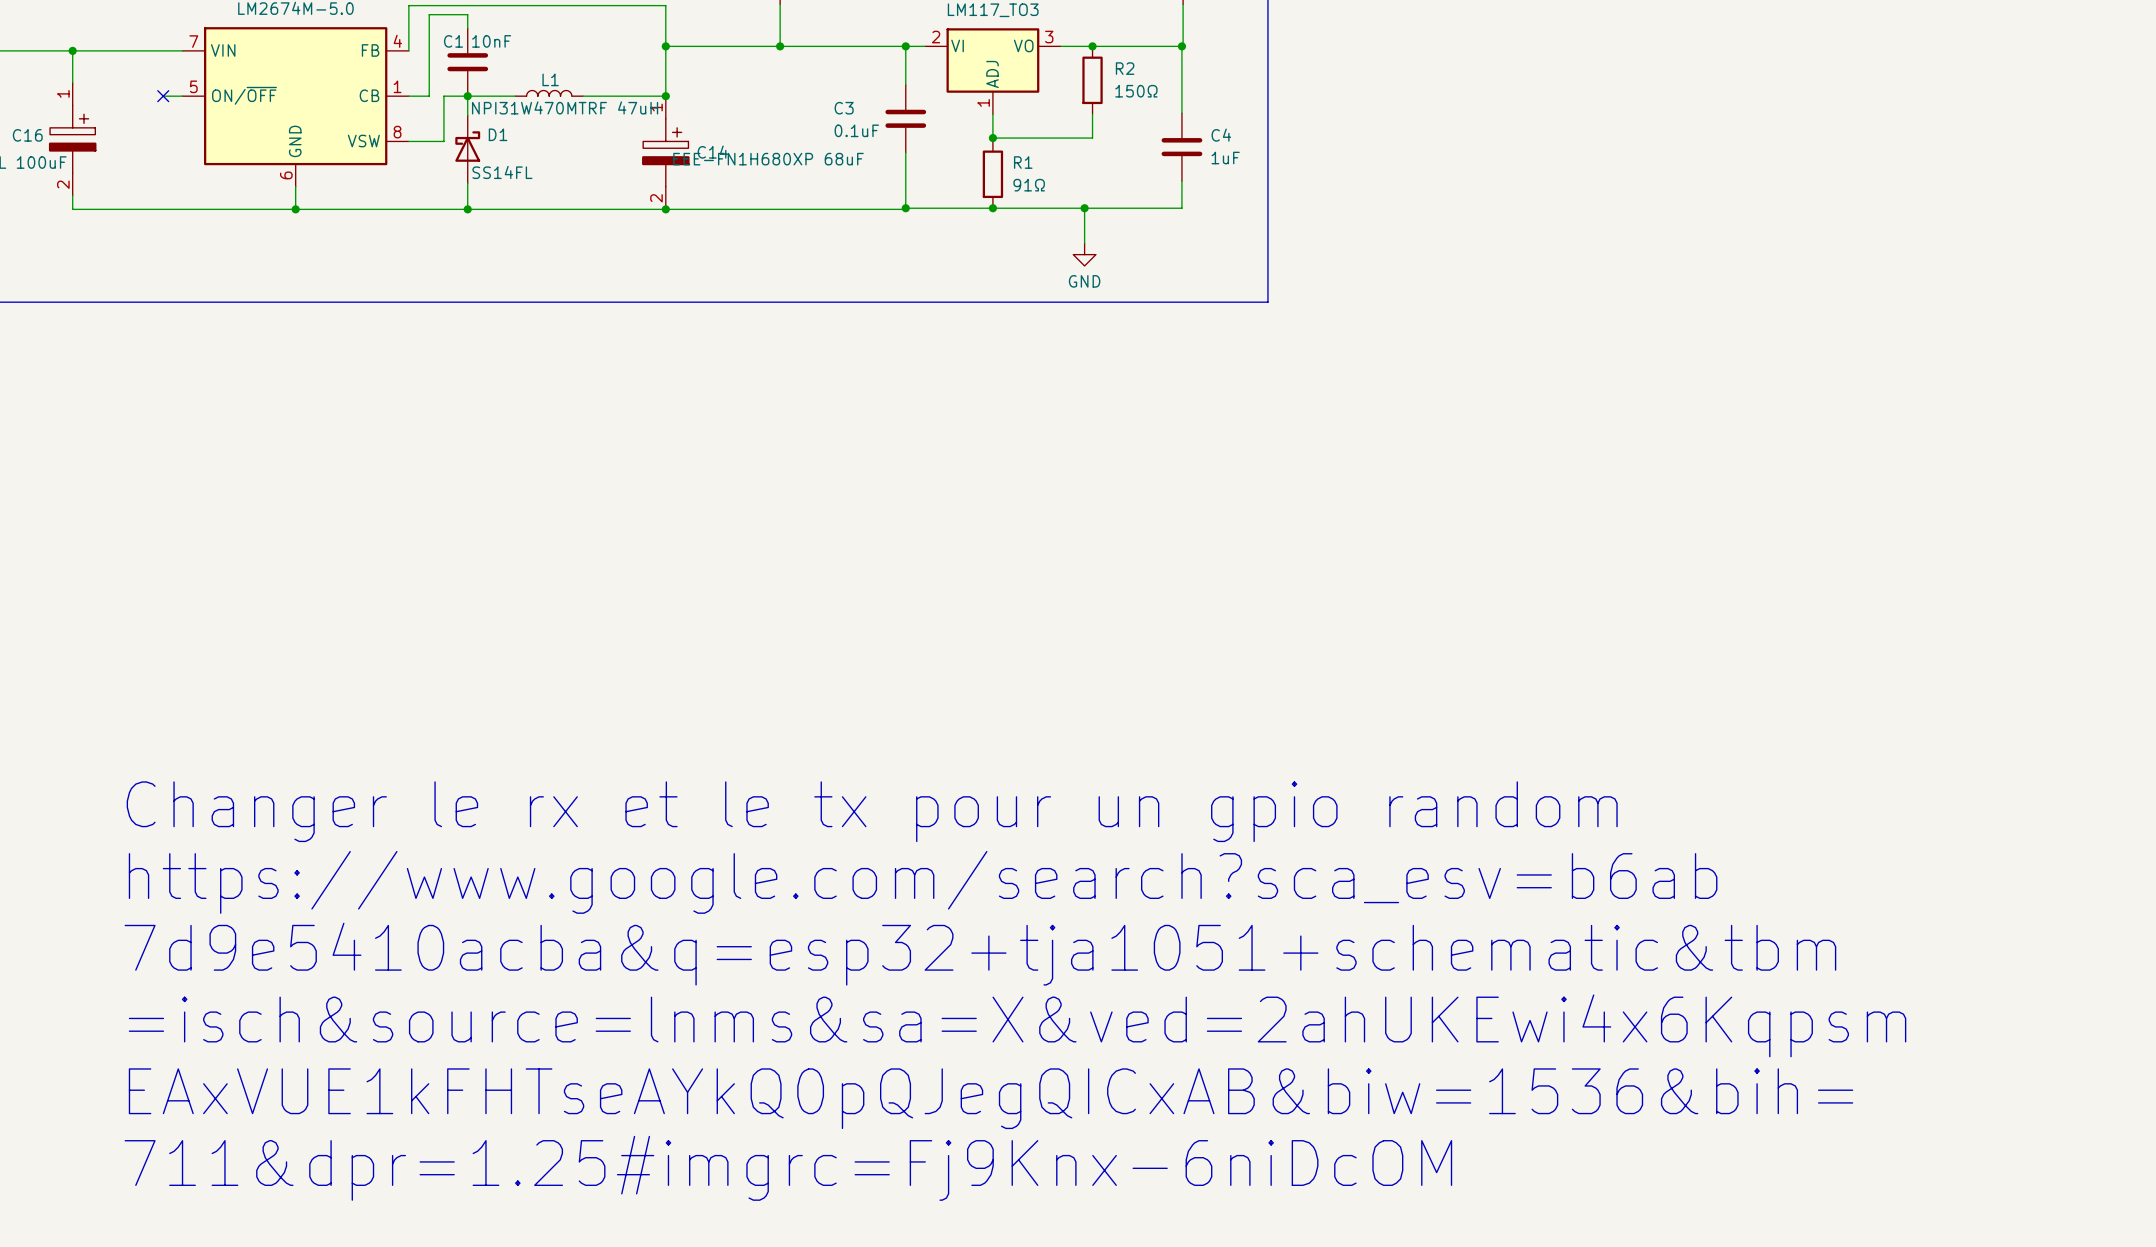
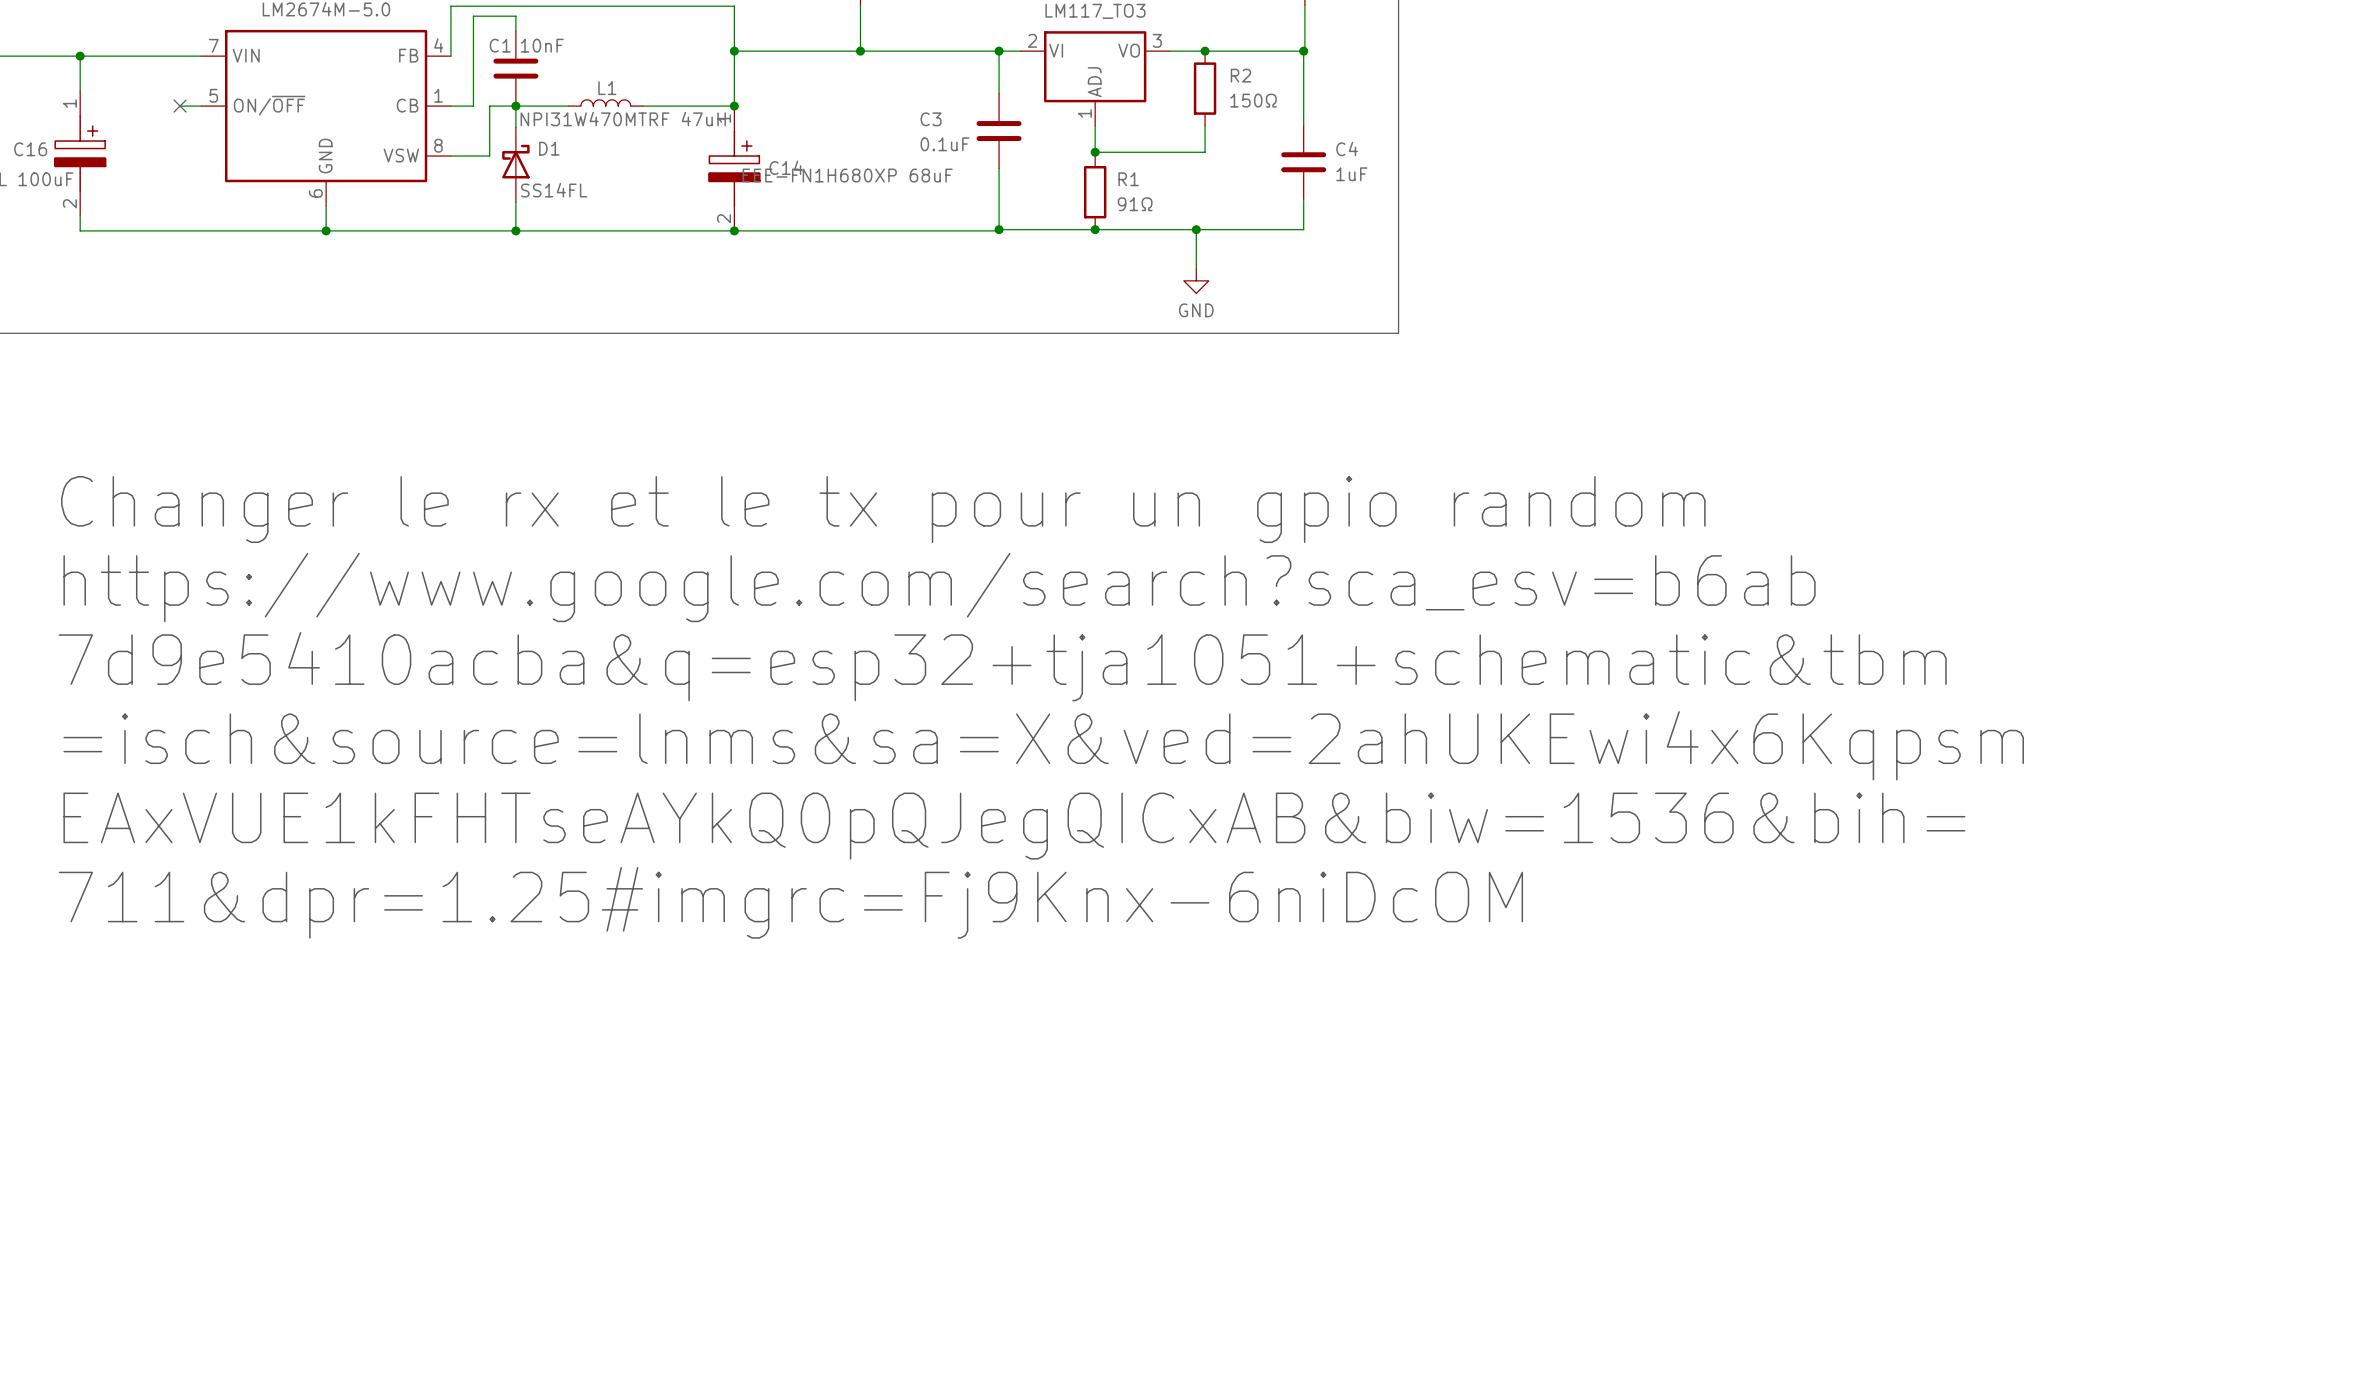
text: none -> Changer le rx et le tx pour un gpio random (883, 509)
text: none -> https://www.google.com/search?sca_esv=b6ab (939, 587)
text: none -> 7d9e5410acba&q=esp32+tja1051+schematic&tbm (1002, 666)
text: none -> =isch&source=lnms&sa=X&ved=2ahUKEwi4x6Kqpsm (1043, 745)
text: none -> EAxVUE1kFHTseAYkQ0pQJegQICxAB&biw=1536&bih= (1014, 826)
text: Changer le rx et le tx pour un gpio random (872, 811) -> none
text: none -> 711&dpr=1.25#imgrc=Fj9Knx-6niDcOM (790, 902)
text: https://www.google.com/search?sca_esv=b6ab (923, 882) -> none
text: 7d9e5410acba&q=esp32+tja1051+schematic&tbm (980, 954) -> none
text: =isch&source=lnms&sa=X&ved=2ahUKEwi4x6Kqpsm (1017, 1025) -> none
text: EAxVUE1kFHTseAYkQ0pQJegQICxAB&biw=1536&bih= (991, 1098) -> none
text: 711&dpr=1.25#imgrc=Fj9Knx-6niDcOM (788, 1168) -> none

